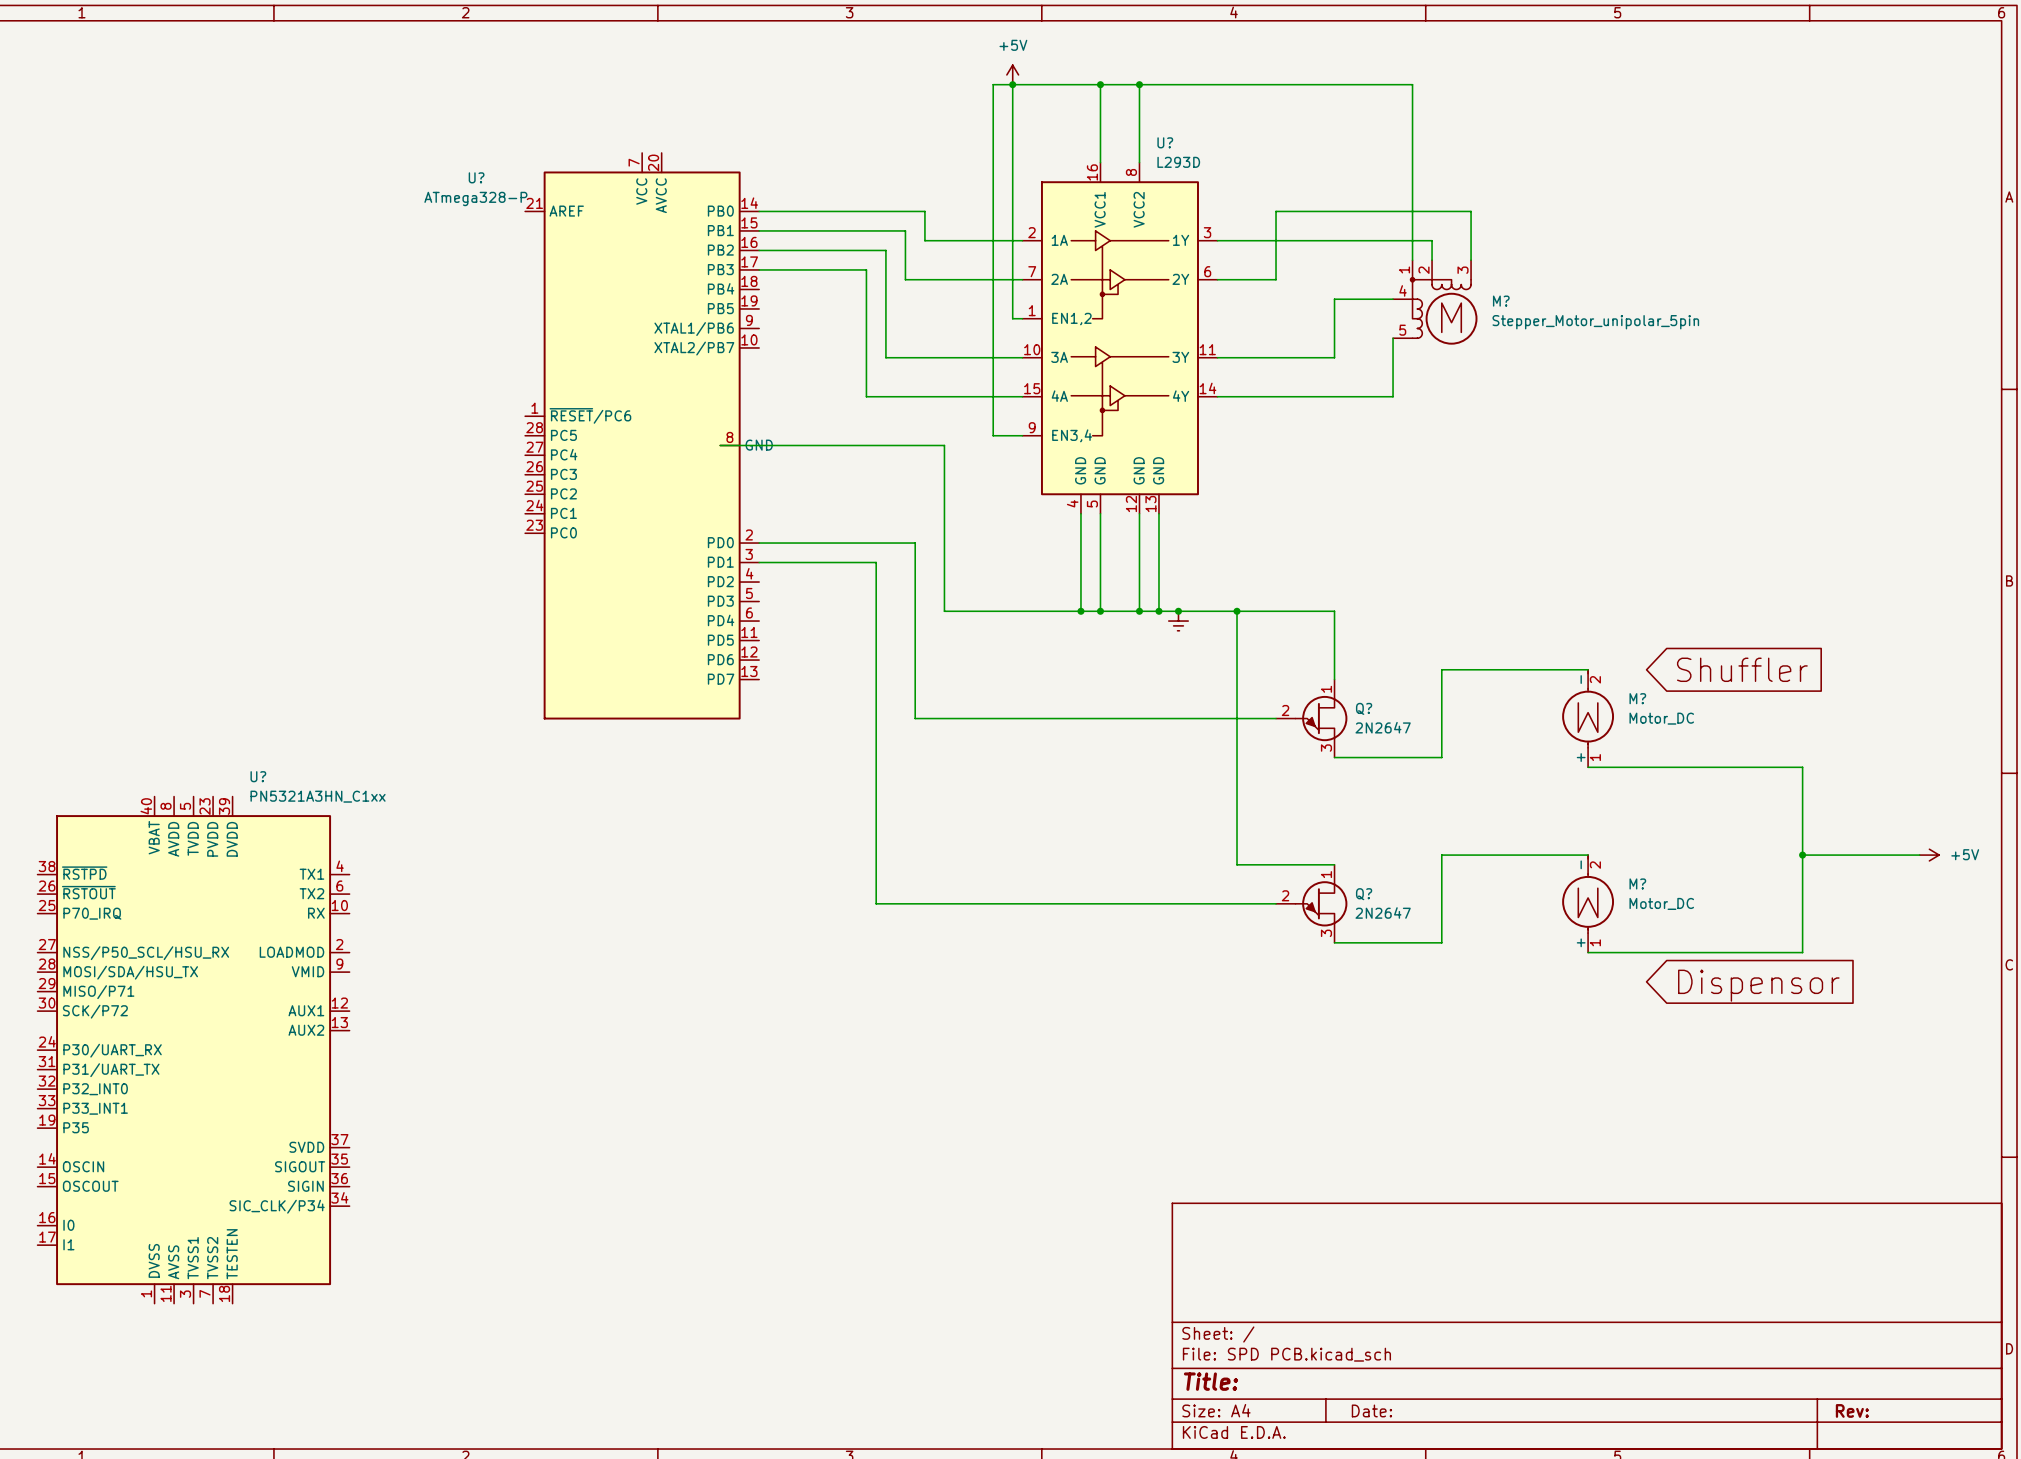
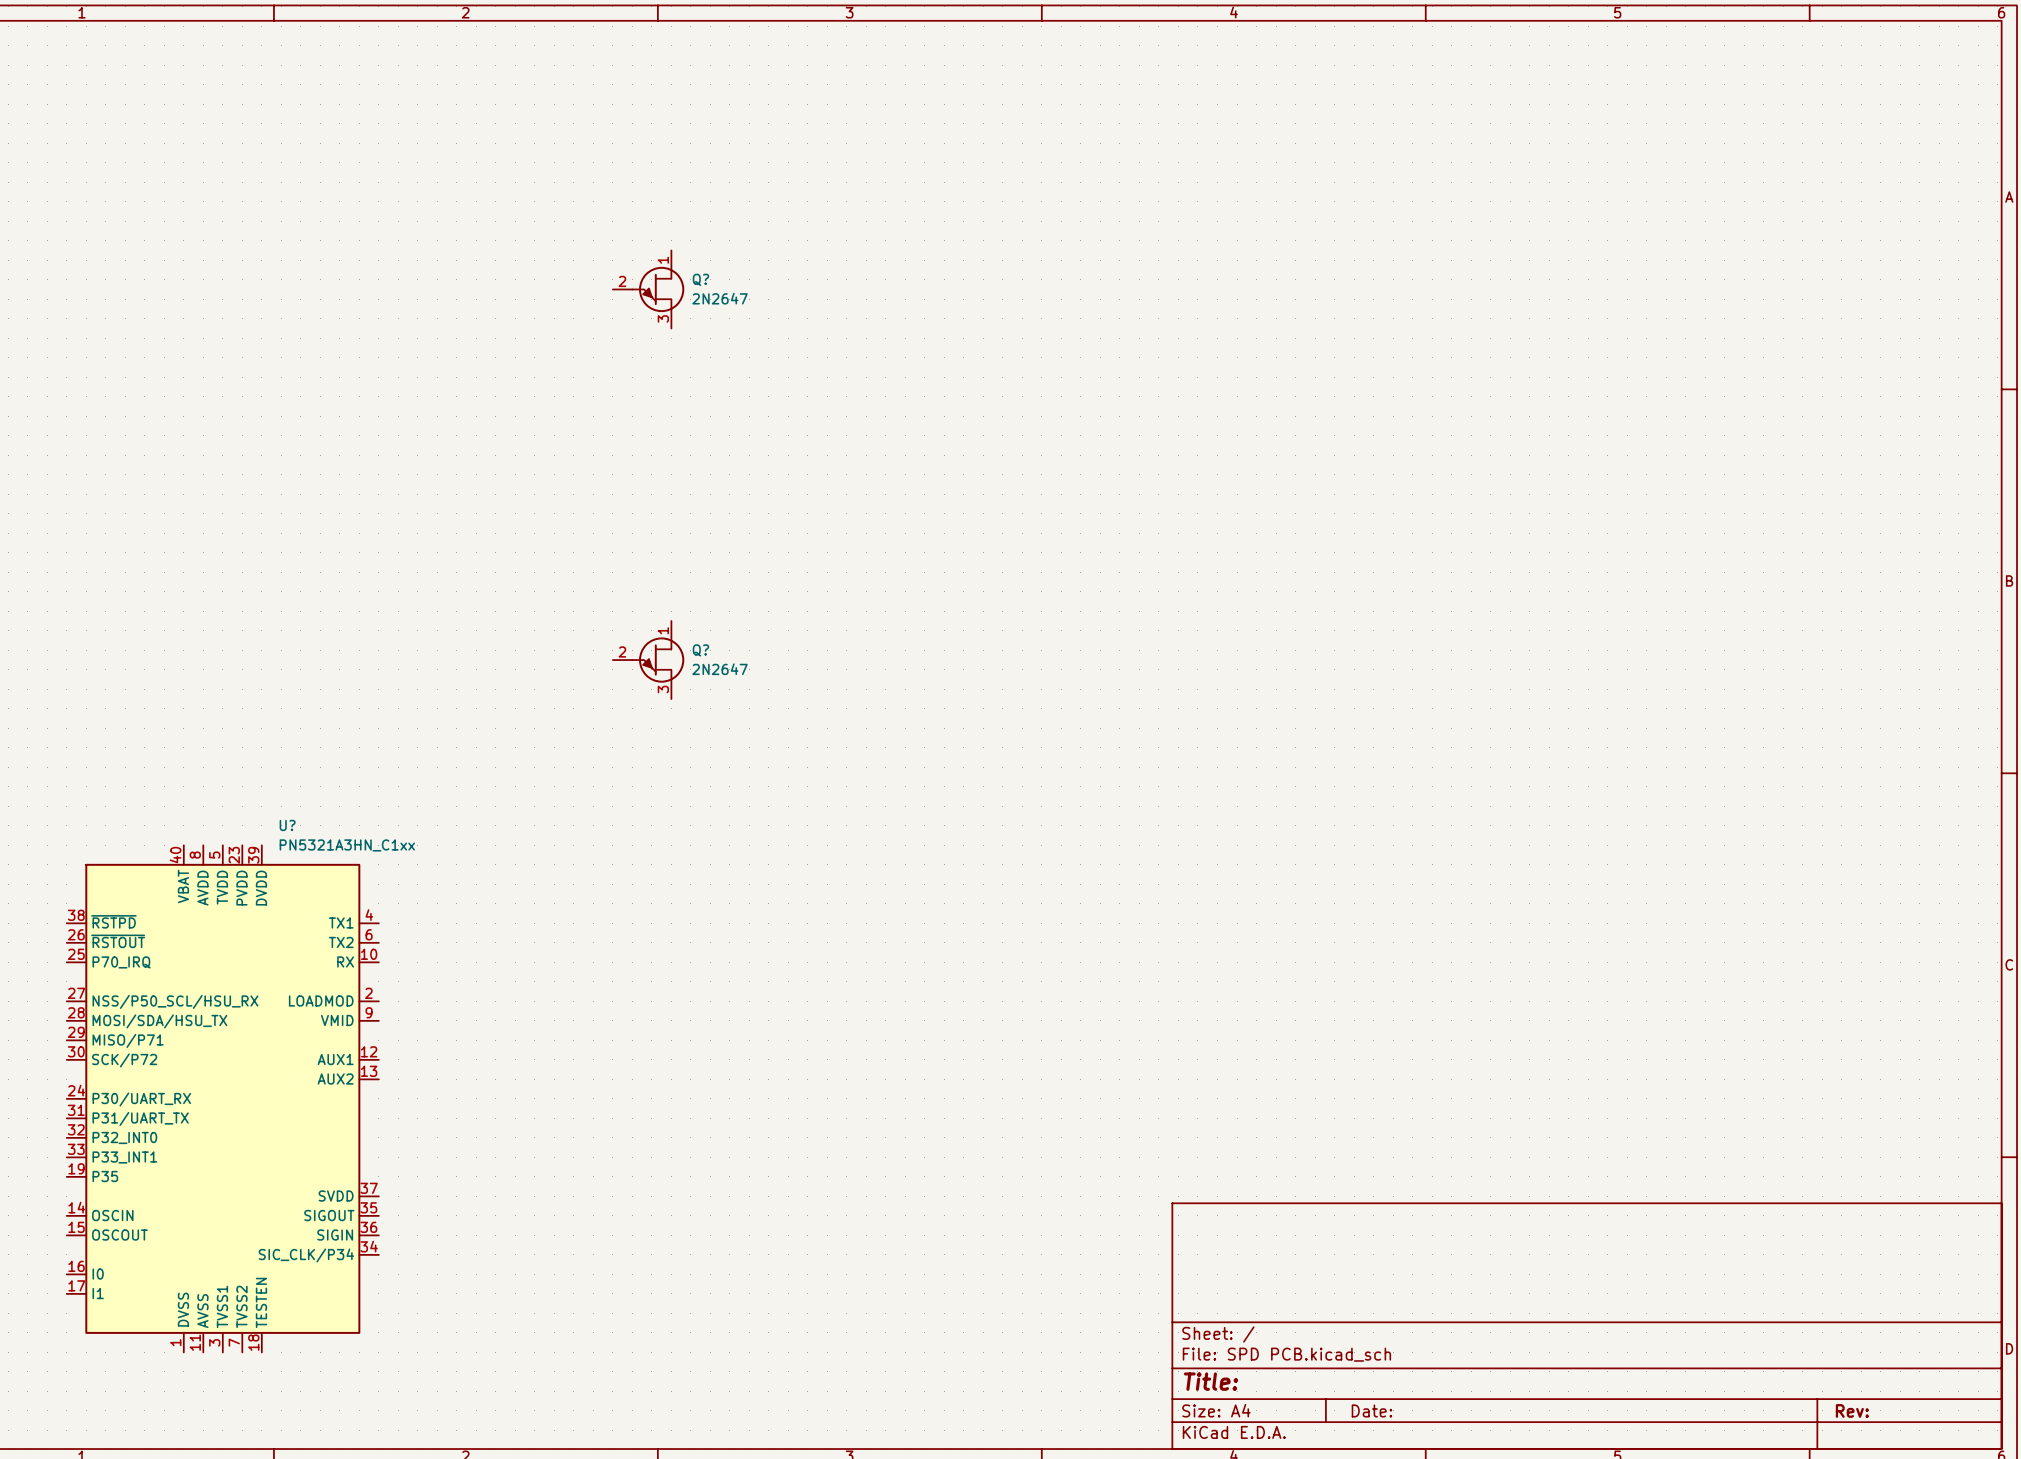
power symbol: +5V (1012, 74) -> none
wire: (1012, 84) (1012, 318) (1022, 318) -> none
junction: (1012, 84) -> none
wire: (1100, 84) (1100, 162) -> none
junction: (1100, 84) -> none
wire: (1139, 84) (1139, 162) -> none
junction: (1139, 84) -> none
wire: (759, 211) (924, 211) (924, 240) (1022, 240) -> none
wire: (759, 230) (905, 230) (905, 279) (1022, 279) -> none
wire: (1217, 240) (1432, 240) (1432, 260) -> none
wire: (759, 250) (885, 250) (885, 357) (1022, 357) -> none
wire: (1412, 260) (1412, 84) (993, 84) (993, 435) (1022, 435) -> none
wire: (1471, 260) (1471, 211) (1276, 211) (1276, 279) (1217, 279) -> none
wire: (759, 269) (866, 269) (866, 396) (1022, 396) -> none
Q?: none -> 2N2647 (648, 289)
wire: (1393, 299) (1334, 299) (1334, 357) (1217, 357) -> none
M?: Stepper_Motor_unipolar_5pin (1435, 302) -> none
U?: L293D (1119, 338) -> none
wire: (1393, 338) (1393, 396) (1217, 396) -> none
U?: ATmega328-P (642, 436) -> none
wire: (720, 445) (944, 445) (944, 611) (1334, 611) (1334, 679) -> none
wire: (1080, 513) (1080, 611) -> none
wire: (1100, 513) (1100, 611) -> none
wire: (1139, 513) (1139, 611) -> none
wire: (1158, 513) (1158, 611) -> none
wire: (759, 543) (915, 543) (915, 718) (1276, 718) -> none
wire: (759, 562) (876, 562) (876, 903) (1276, 903) -> none
junction: (1080, 611) -> none
junction: (1100, 611) -> none
junction: (1139, 611) -> none
junction: (1158, 611) -> none
junction: (1178, 611) -> none
wire: (1237, 611) (1237, 864) (1334, 864) -> none
junction: (1237, 611) -> none
power symbol: (1178, 621) -> none
Q?: none -> 2N2647 (648, 660)
wire: (1588, 669) (1441, 669) (1441, 757) (1334, 757) -> none
global label: Shuffler (1742, 669) -> none
Q?: 2N2647 (1311, 718) -> none
M?: Motor_DC (1588, 718) -> none
wire: (1588, 767) (1802, 767) (1802, 952) (1588, 952) -> none
wire: (1588, 855) (1441, 855) (1441, 942) (1334, 942) -> none
wire: (1802, 855) (1919, 855) -> none
junction: (1802, 855) -> none
power symbol: +5V (1929, 855) -> none
Q?: 2N2647 (1311, 903) -> none
M?: Motor_DC (1588, 903) -> none
global label: Dispensor (1758, 985) -> none
U? position: (193, 1050) -> (222, 1098)

